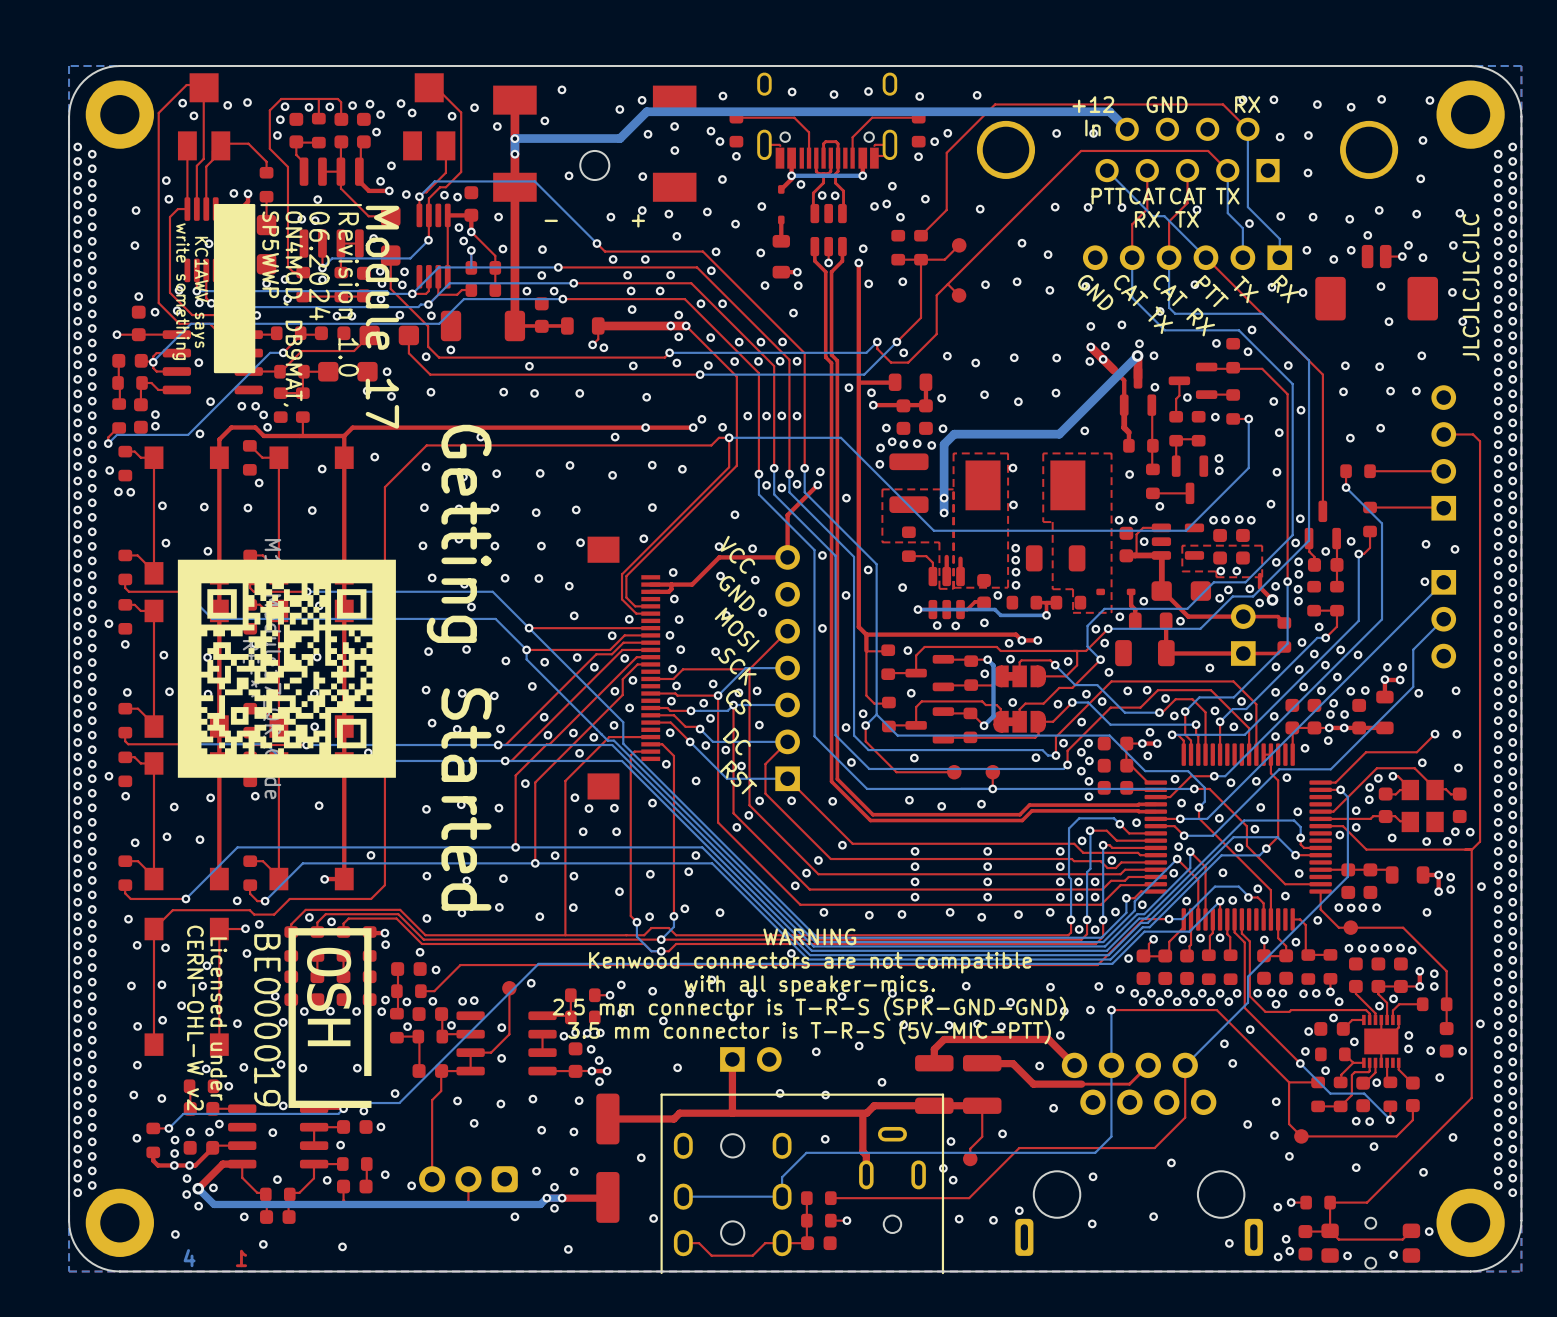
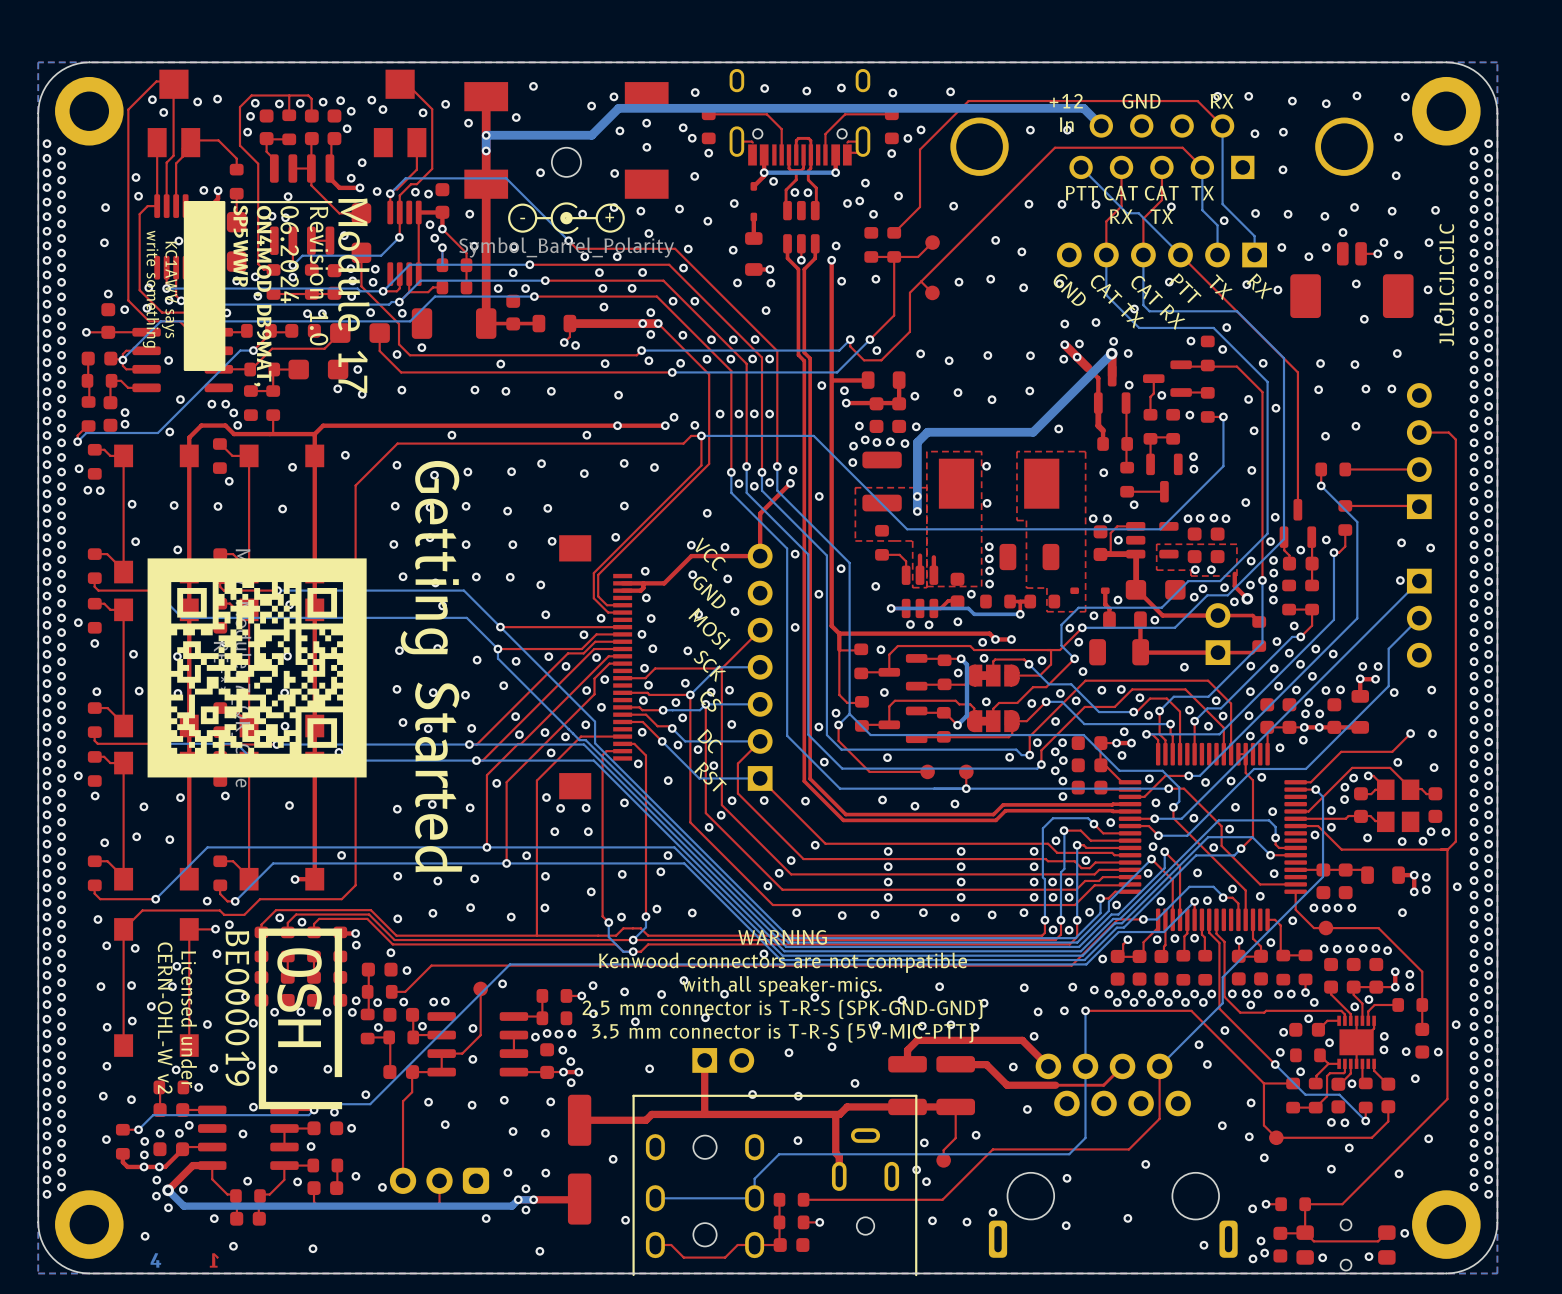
drawing: none -> [508, 202, 625, 234]

